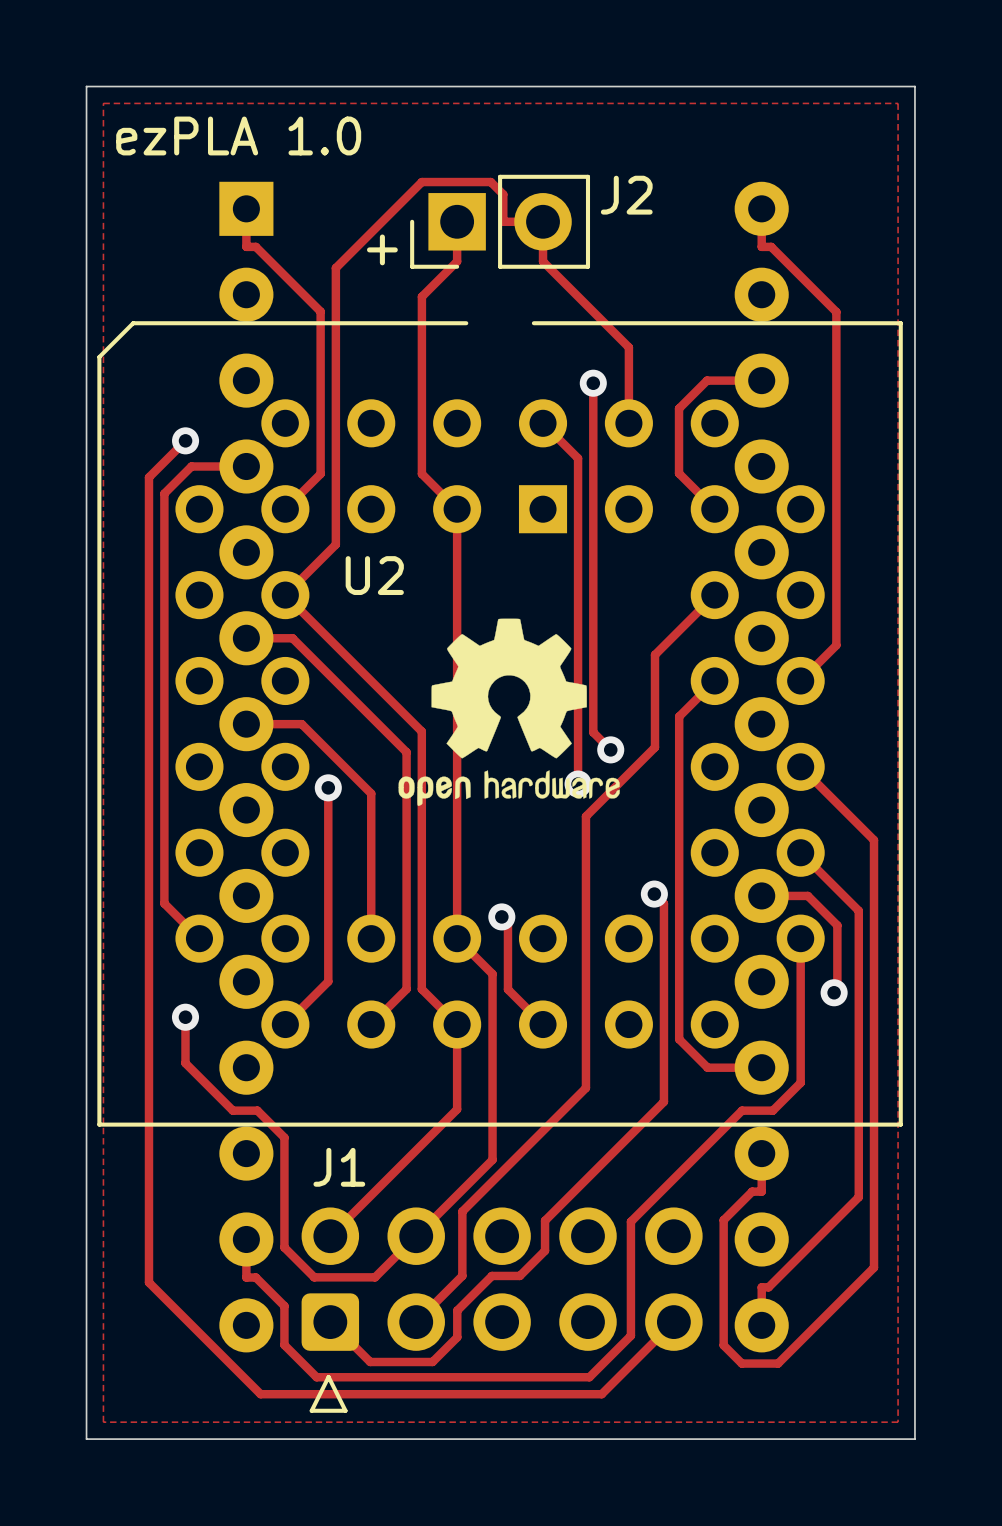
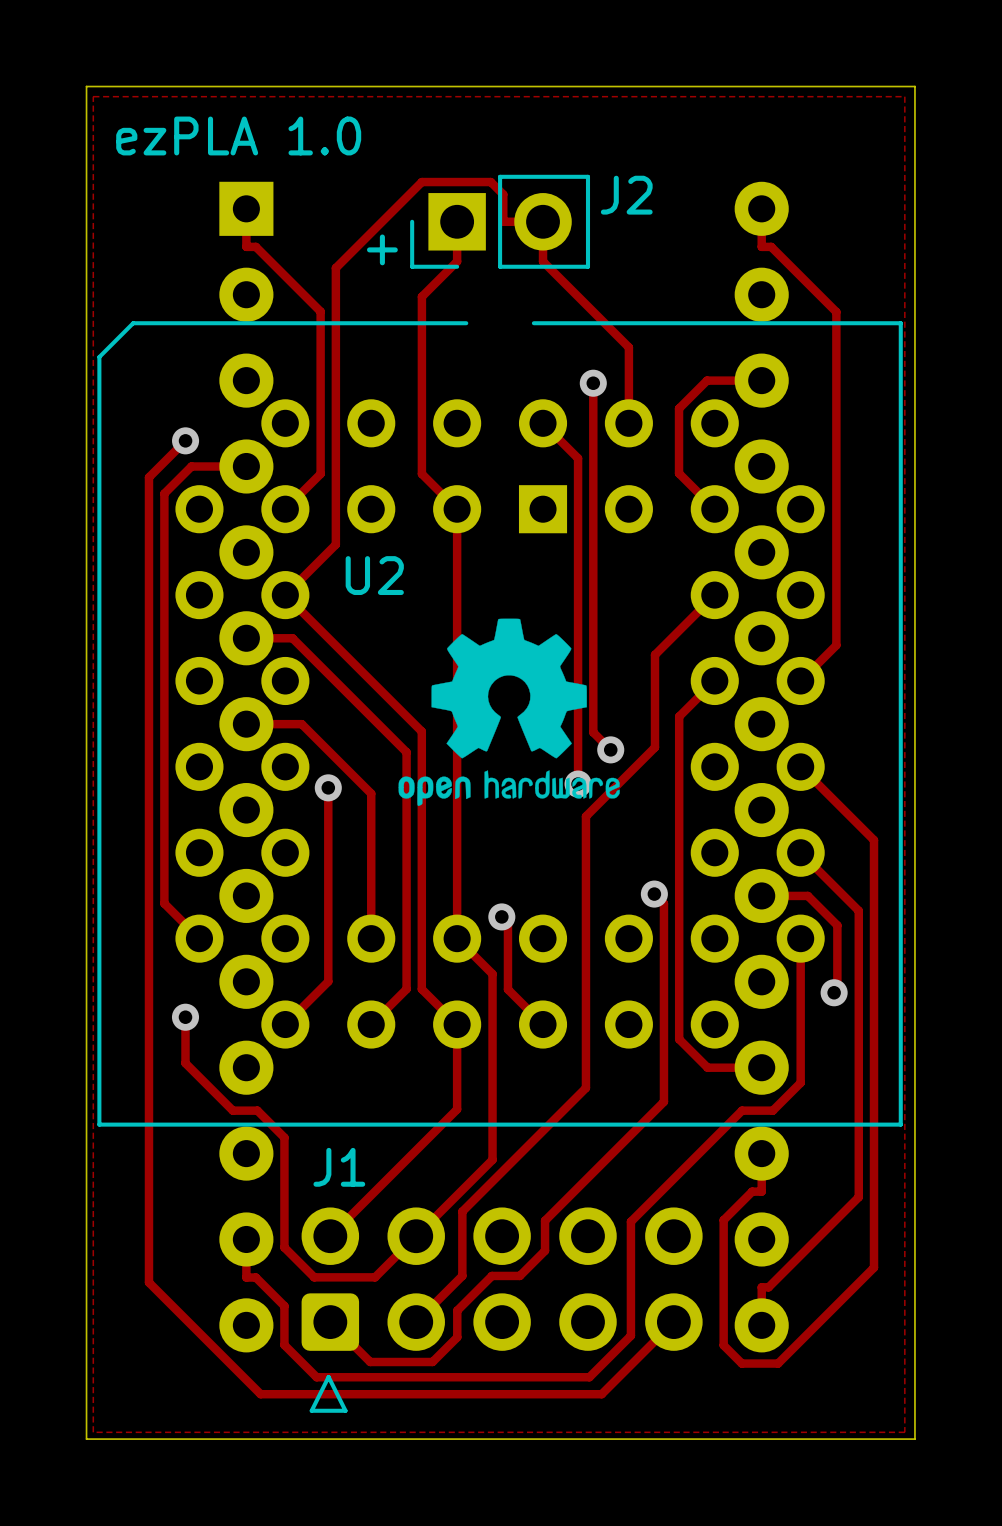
zone outline: (103, 103) (103, 1422) (898, 1422) (898, 103) (103, 103) -> (93, 96) (93, 1432) (904, 1432) (904, 96) (93, 96)

